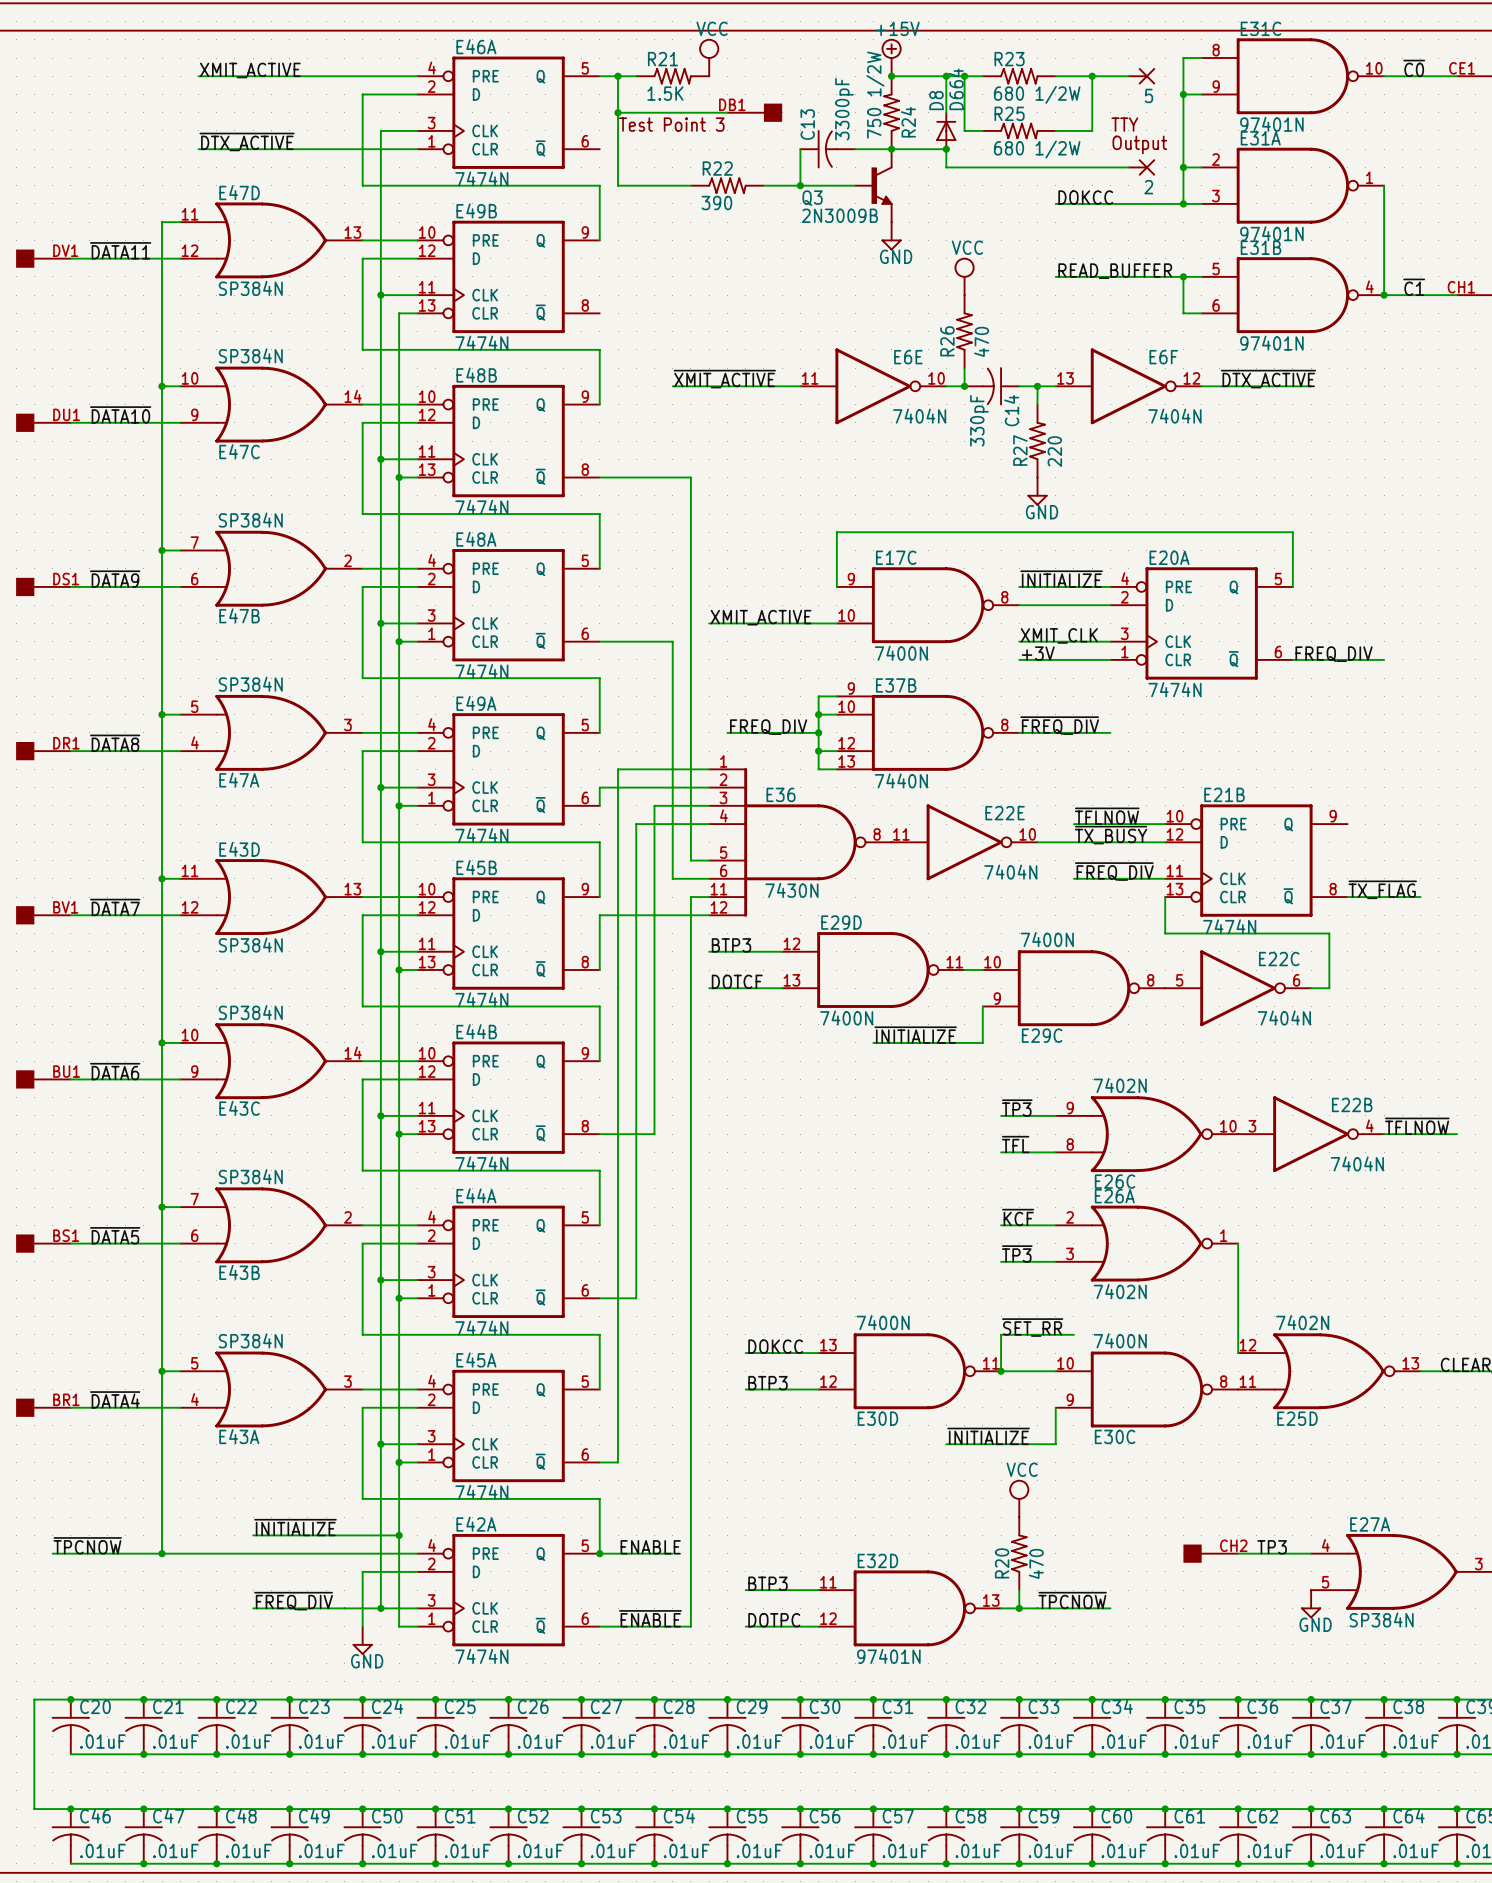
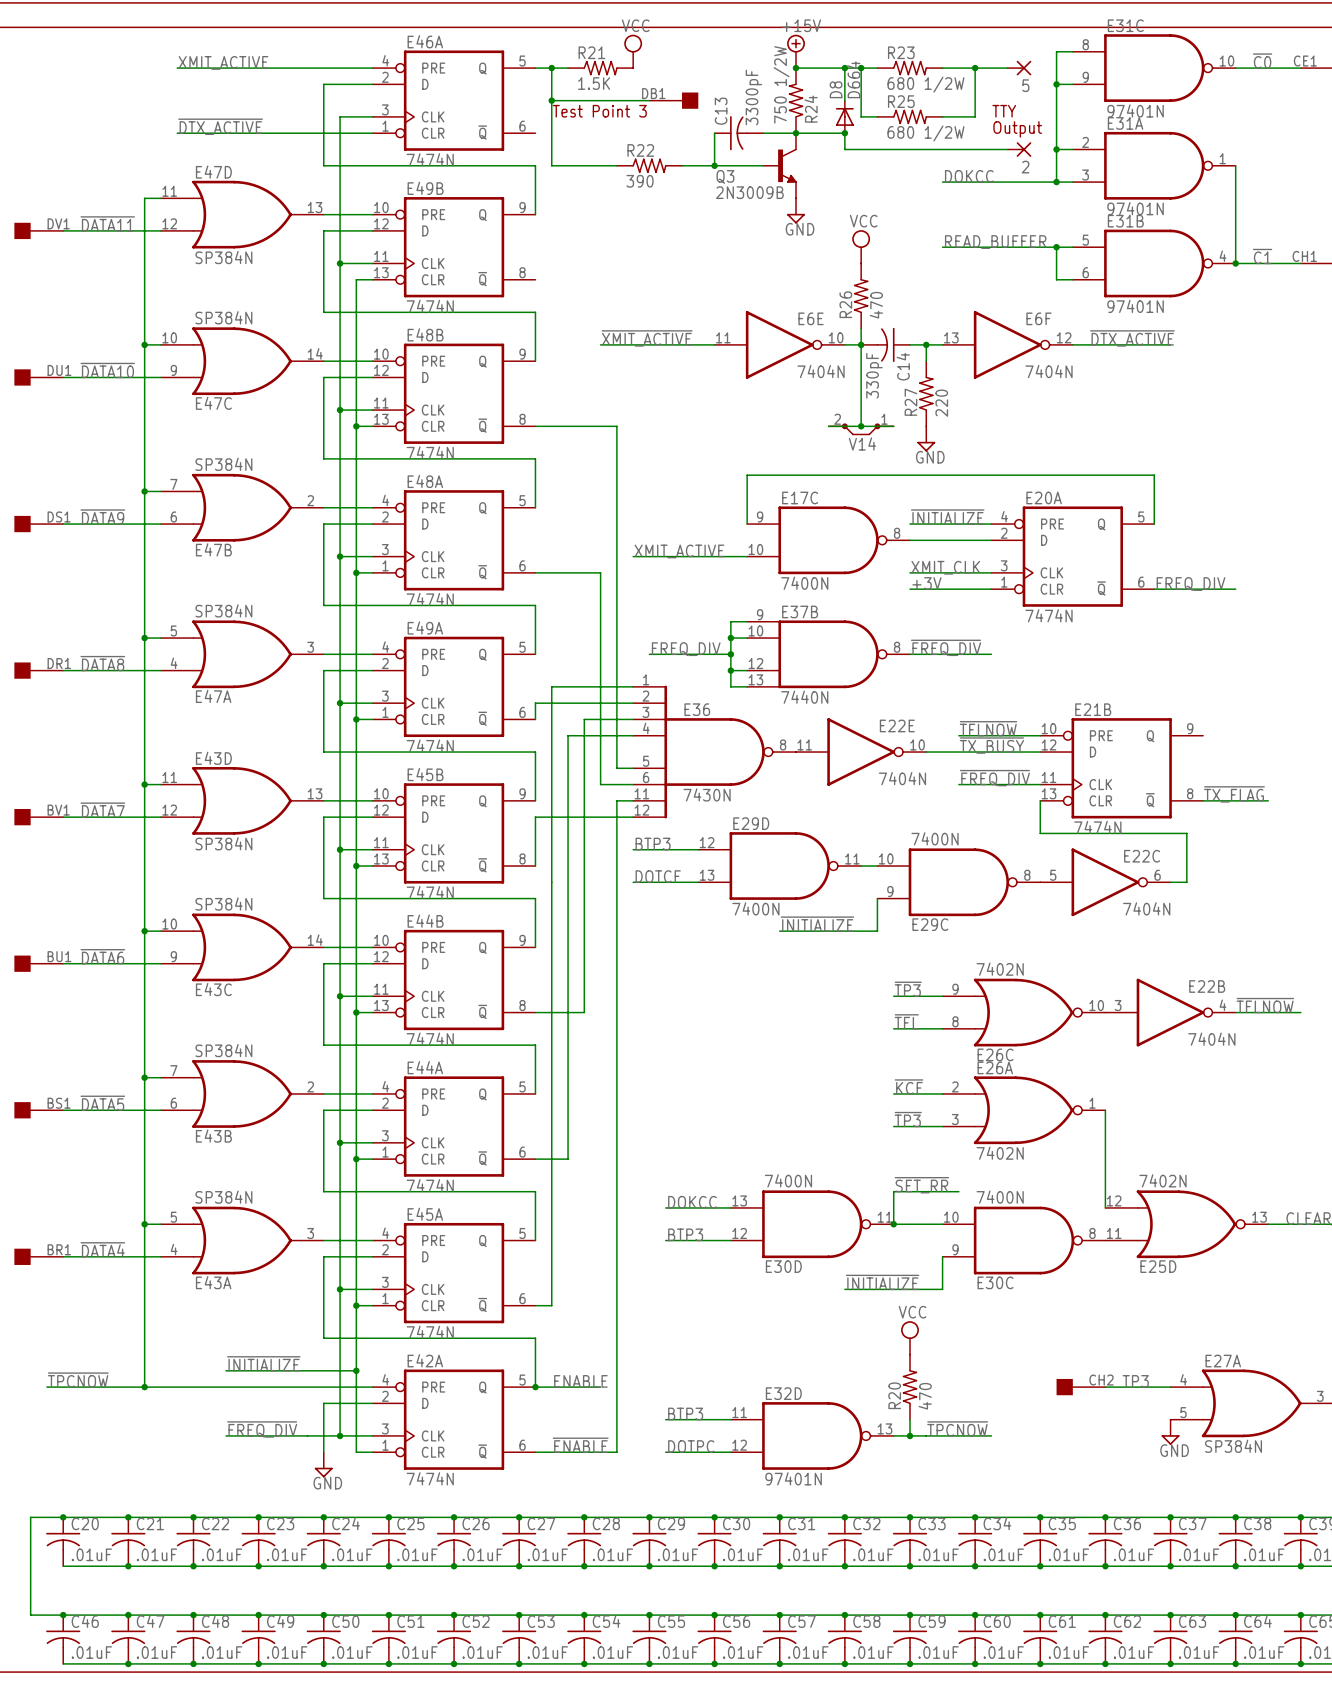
wire: none -> (861, 344) (861, 426)
wire: none -> (828, 426) (893, 426)
junction: none -> (861, 426)
V14: none -> (861, 429)

